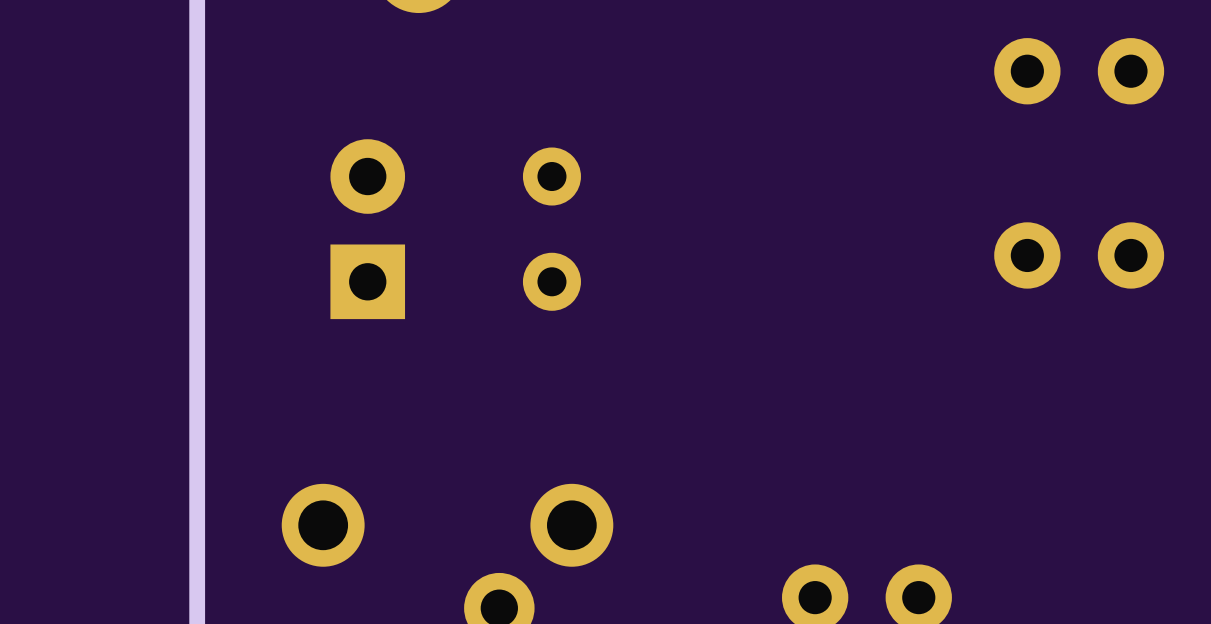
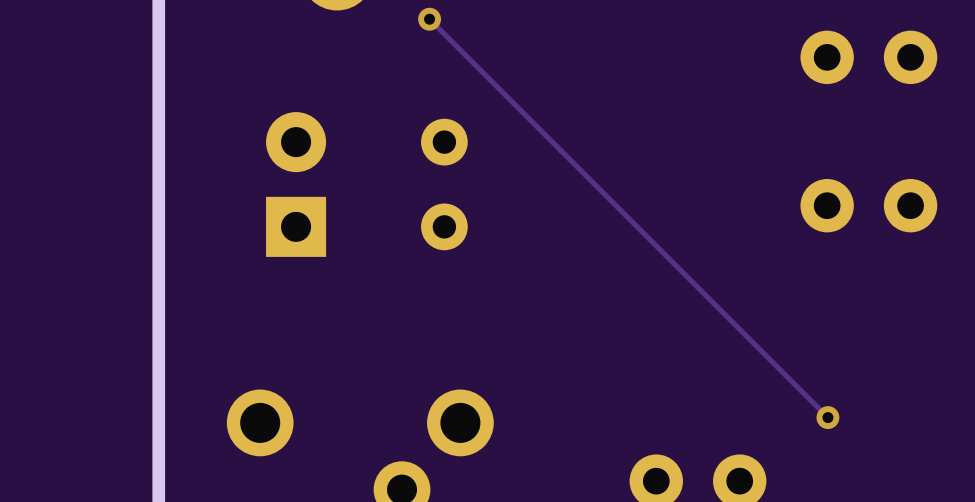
track: none -> (429, 19) (827, 417)
via: none -> (429, 19)
via: none -> (827, 417)

